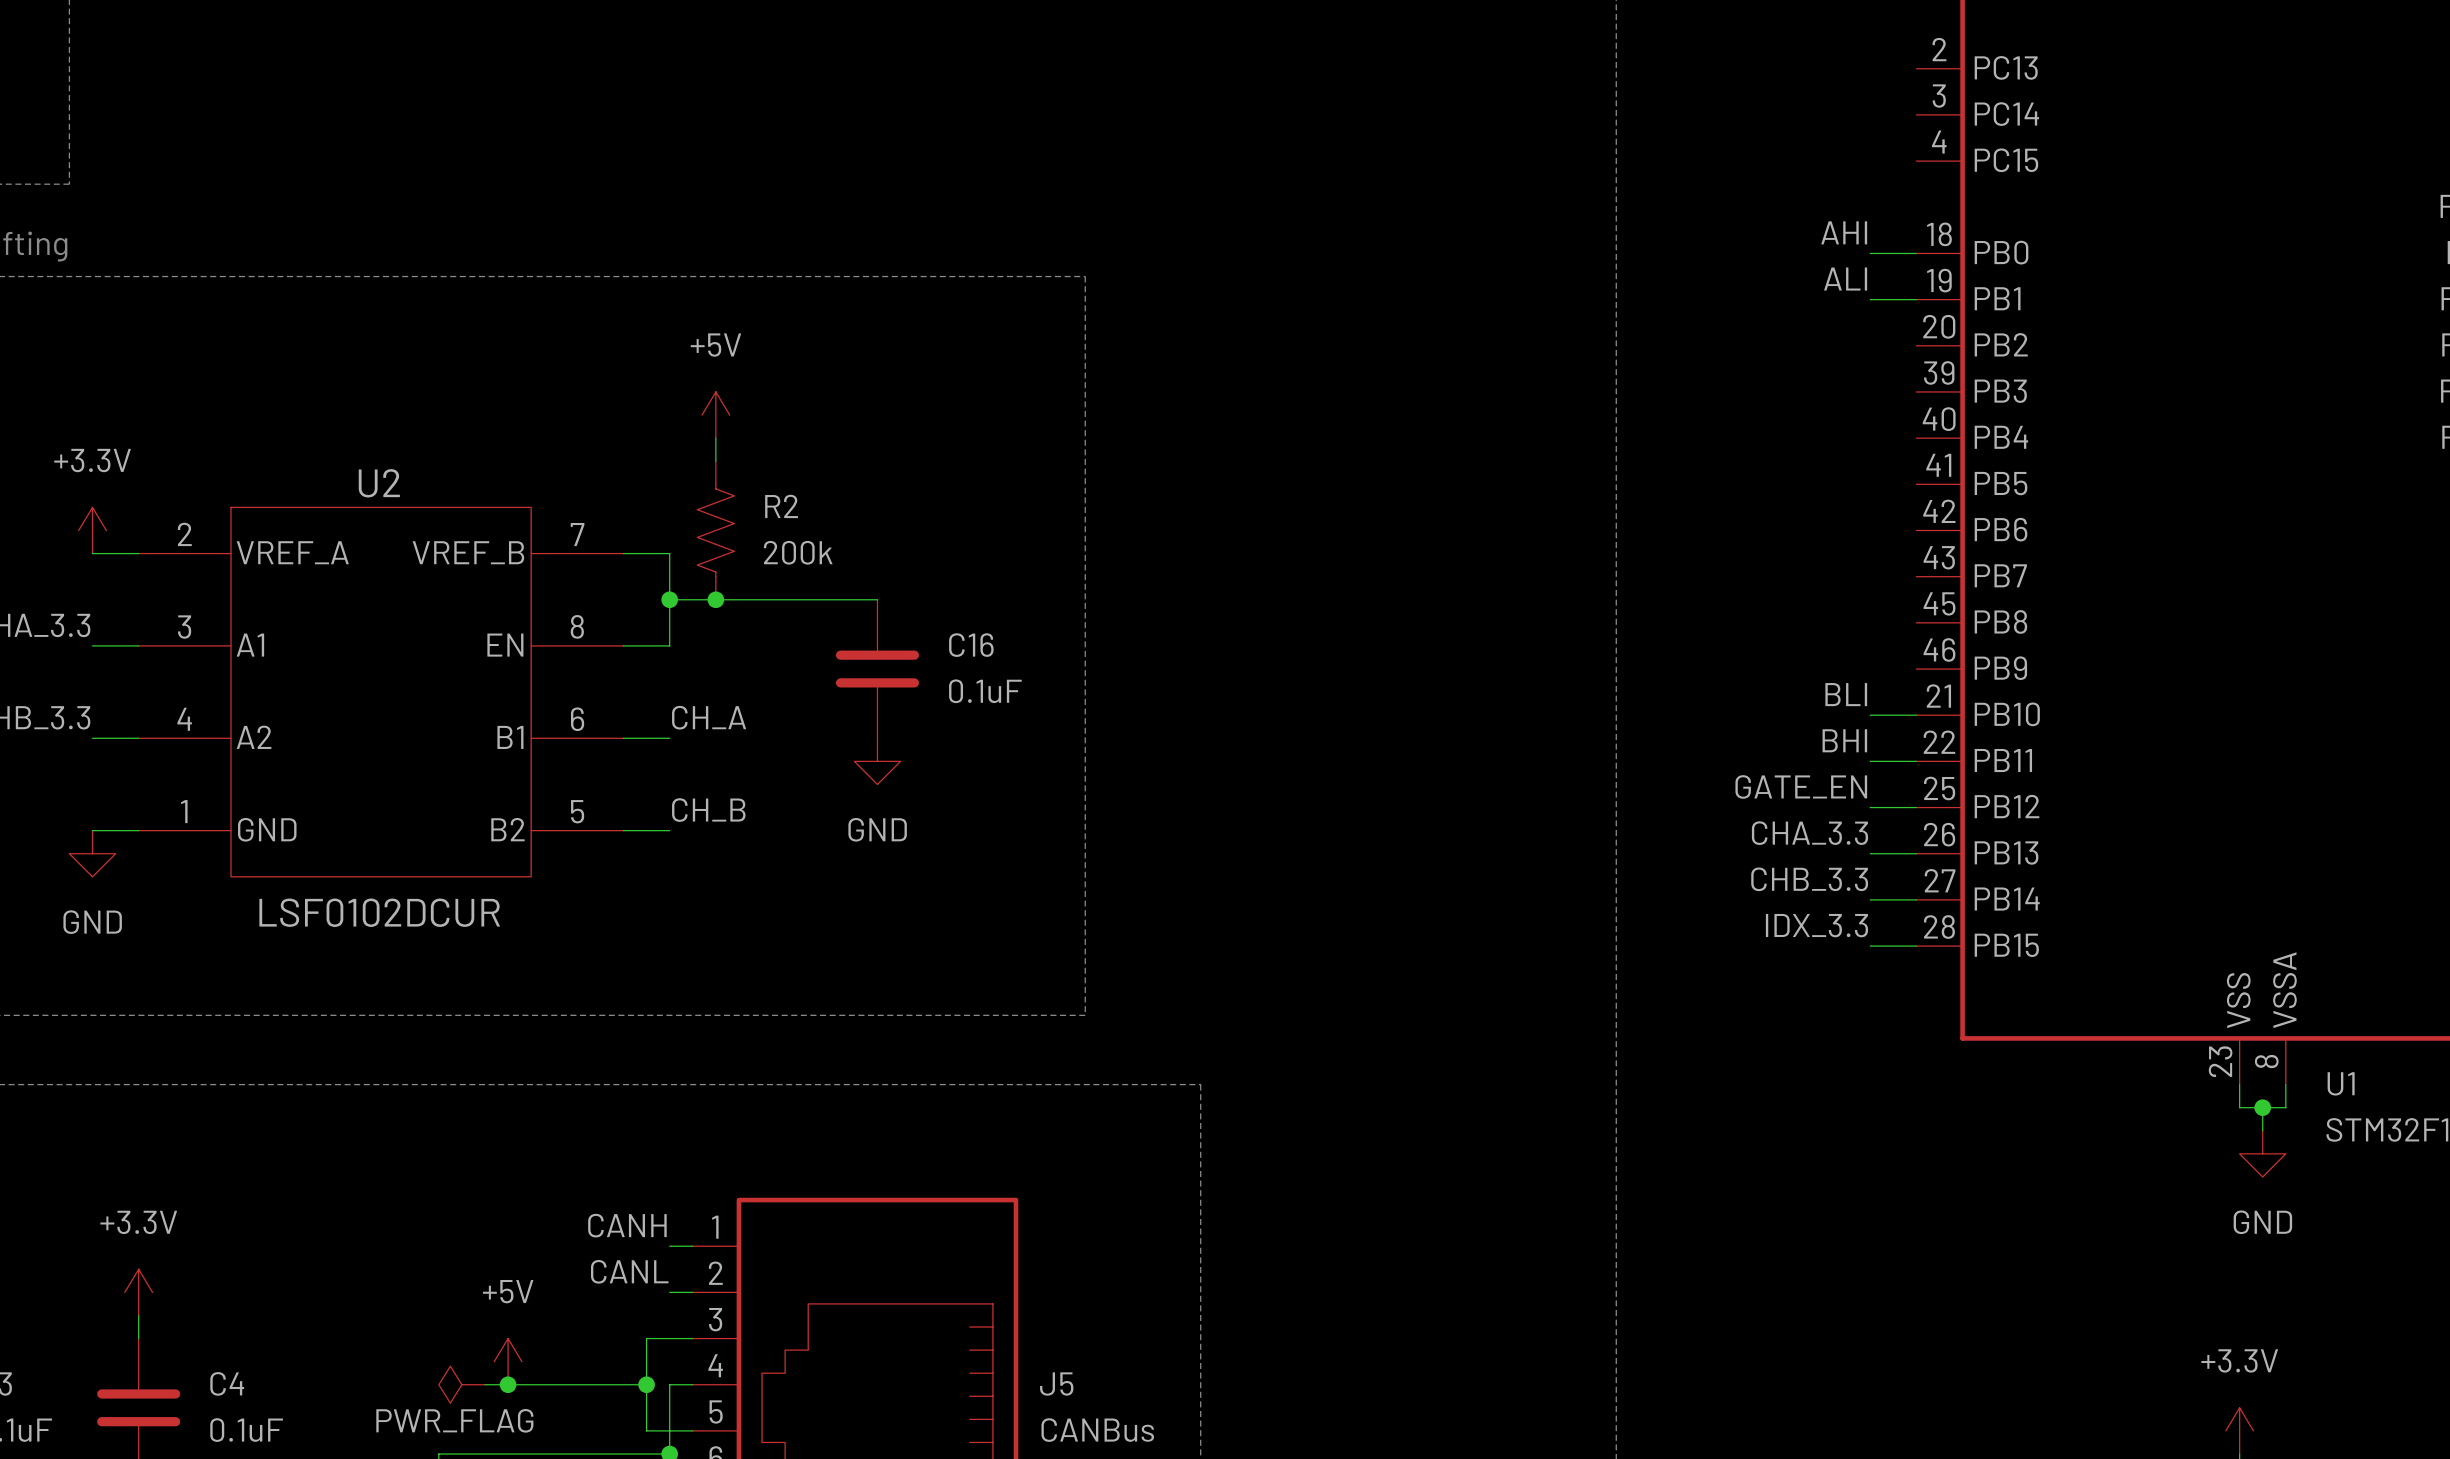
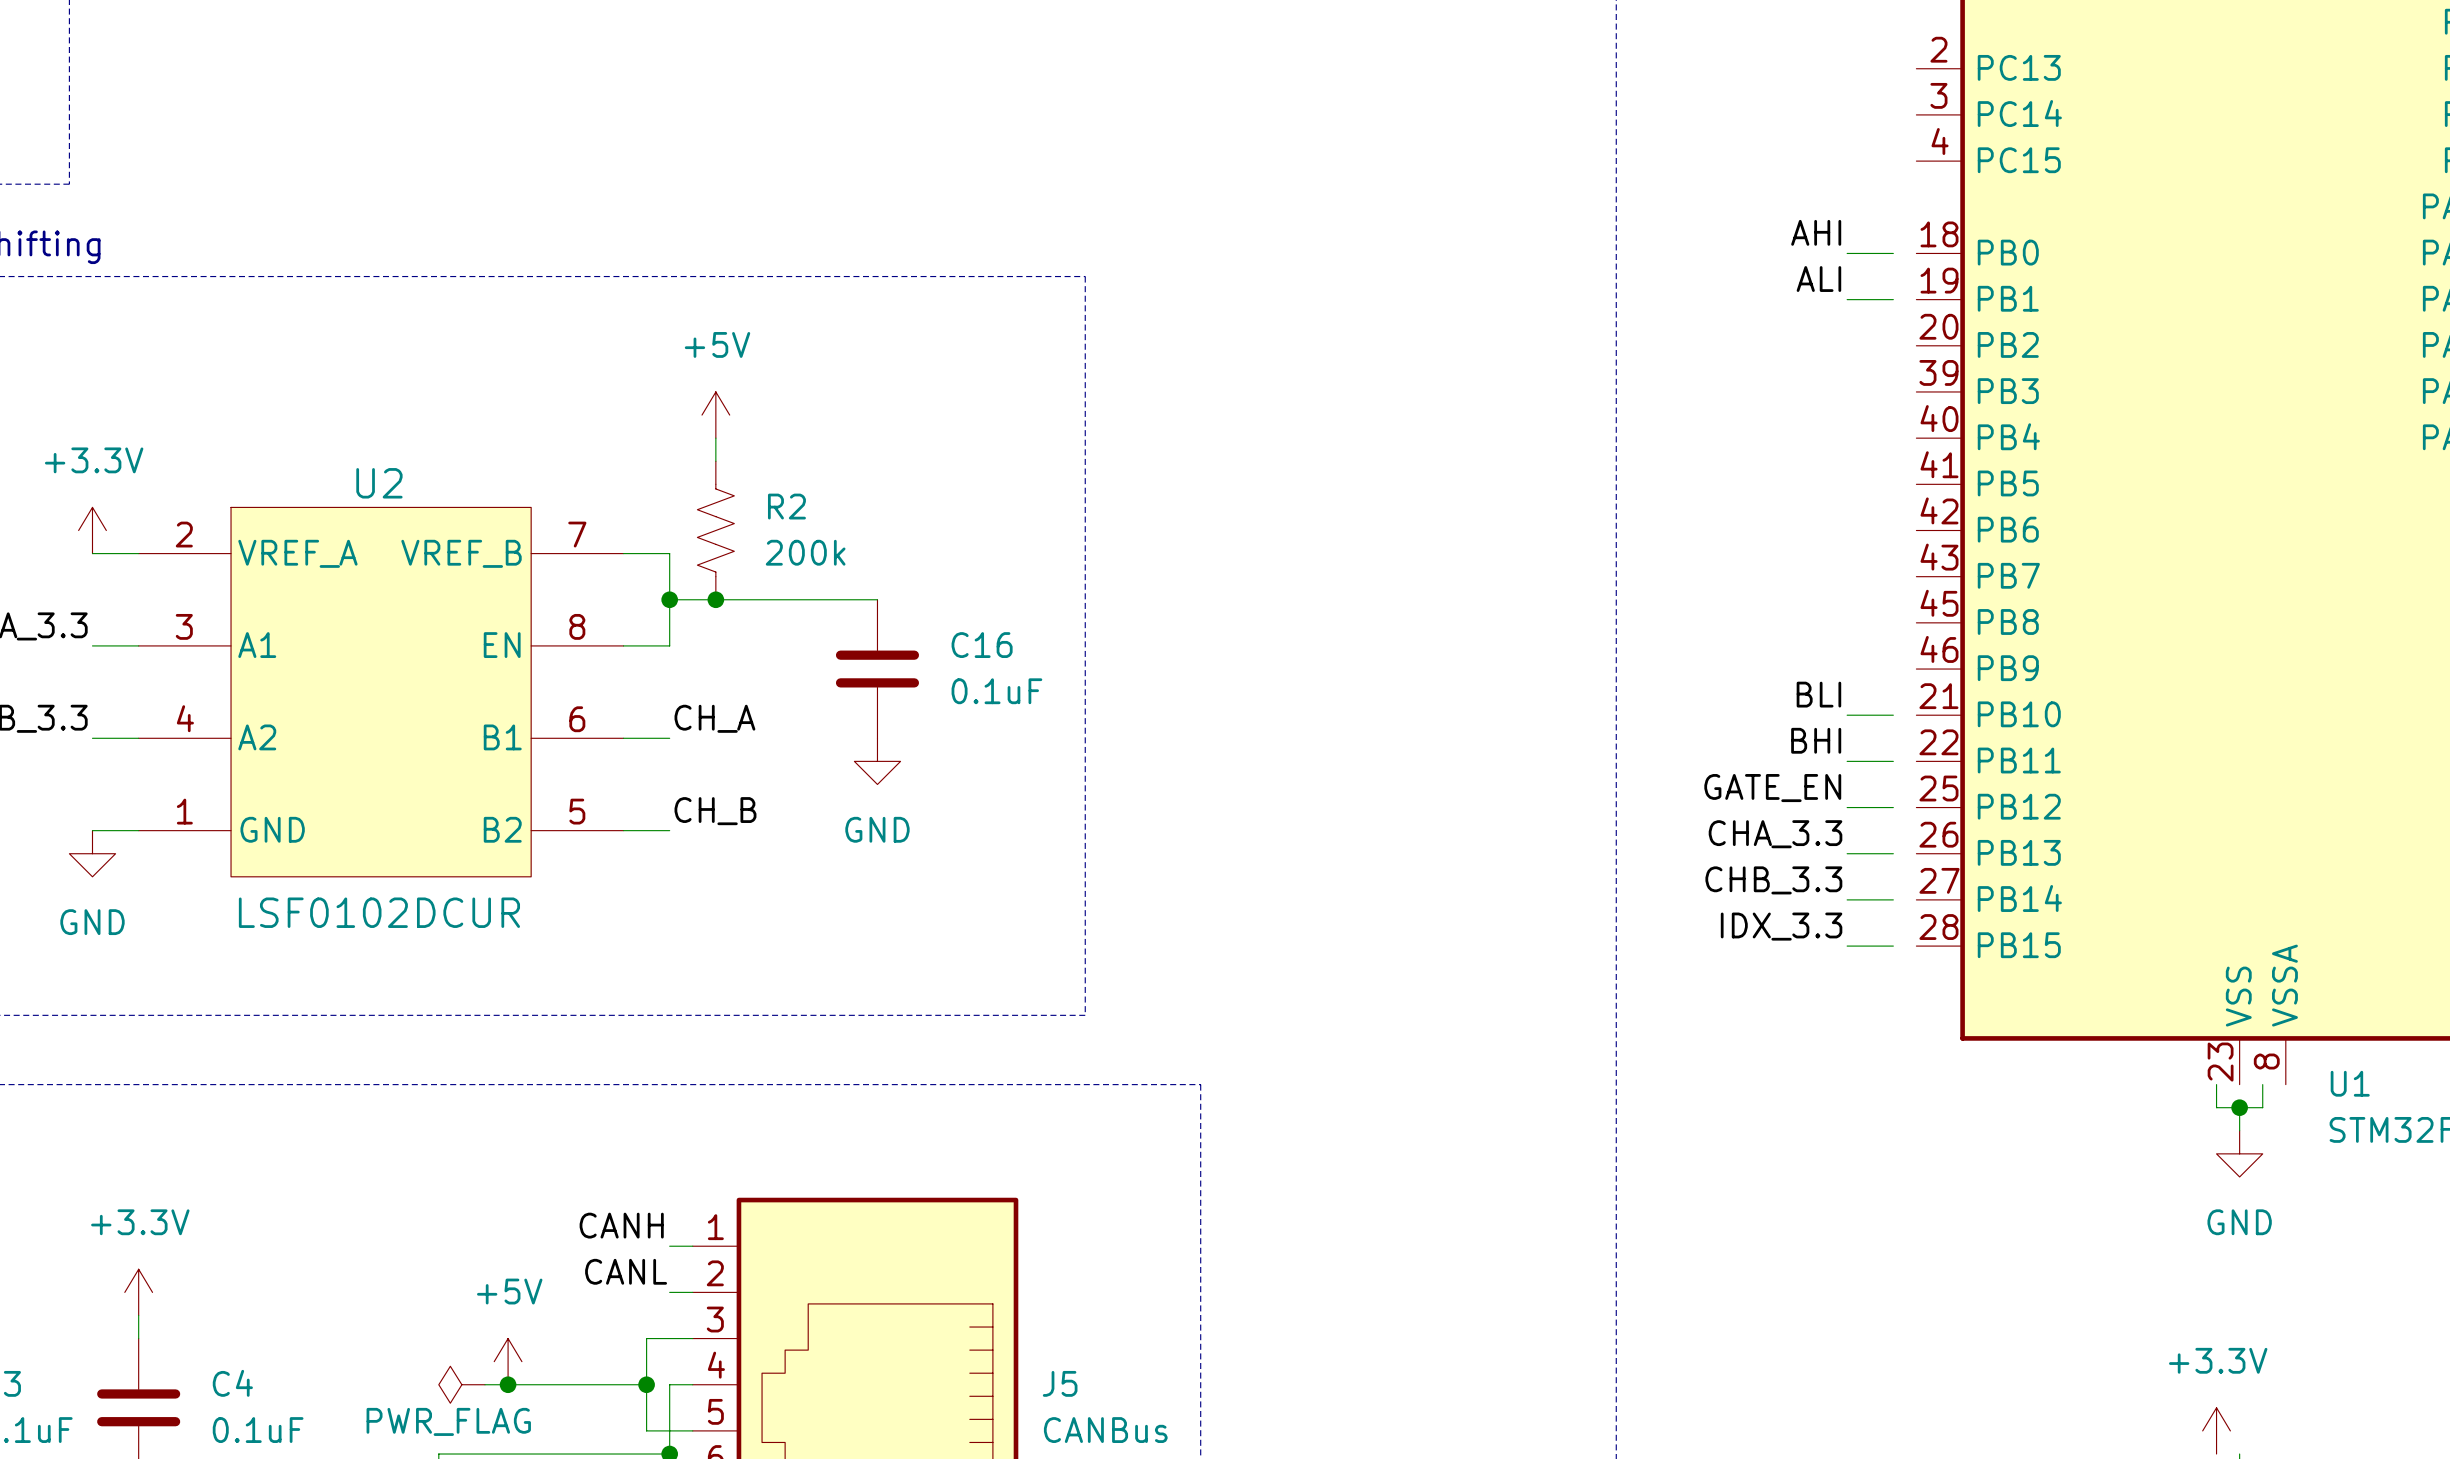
label position: AHI (1844, 232) -> AHI (1816, 232)
wire: (1893, 253) (1916, 253) -> (1847, 253) (1870, 253)
label position: ALI (1845, 279) -> ALI (1818, 279)
wire: (1893, 299) (1916, 299) -> (1847, 299) (1870, 299)
label position: BLI (1846, 694) -> BLI (1818, 694)
wire: (1893, 715) (1916, 715) -> (1847, 715) (1870, 715)
label position: BHI (1844, 740) -> BHI (1816, 740)
wire: (1893, 761) (1916, 761) -> (1847, 761) (1870, 761)
label position: GATE_EN (1801, 786) -> GATE_EN (1772, 788)
wire: (1893, 807) (1916, 807) -> (1847, 807) (1870, 807)
label position: CHA_3.3 (1809, 833) -> CHA_3.3 (1775, 834)
wire: (1893, 853) (1916, 853) -> (1847, 853) (1870, 853)
label position: CHB_3.3 (1809, 879) -> CHB_3.3 (1773, 880)
wire: (1893, 899) (1916, 899) -> (1847, 899) (1870, 899)
label position: IDX_3.3 (1816, 925) -> IDX_3.3 (1781, 926)
wire: (1893, 946) (1916, 946) -> (1847, 946) (1870, 946)
wire: none -> (2216, 1084) (2216, 1107) (2239, 1107) (2239, 1130)
wire: (2239, 1084) (2239, 1107) -> (2262, 1084) (2262, 1107)
wire: (2285, 1084) (2285, 1107) (2262, 1107) (2262, 1130) -> none
junction position: (2262, 1107) -> (2239, 1107)
power symbol position: GND (2262, 1153) -> GND (2239, 1153)
power symbol position: +3.3V (2239, 1430) -> +3.3V (2216, 1430)

